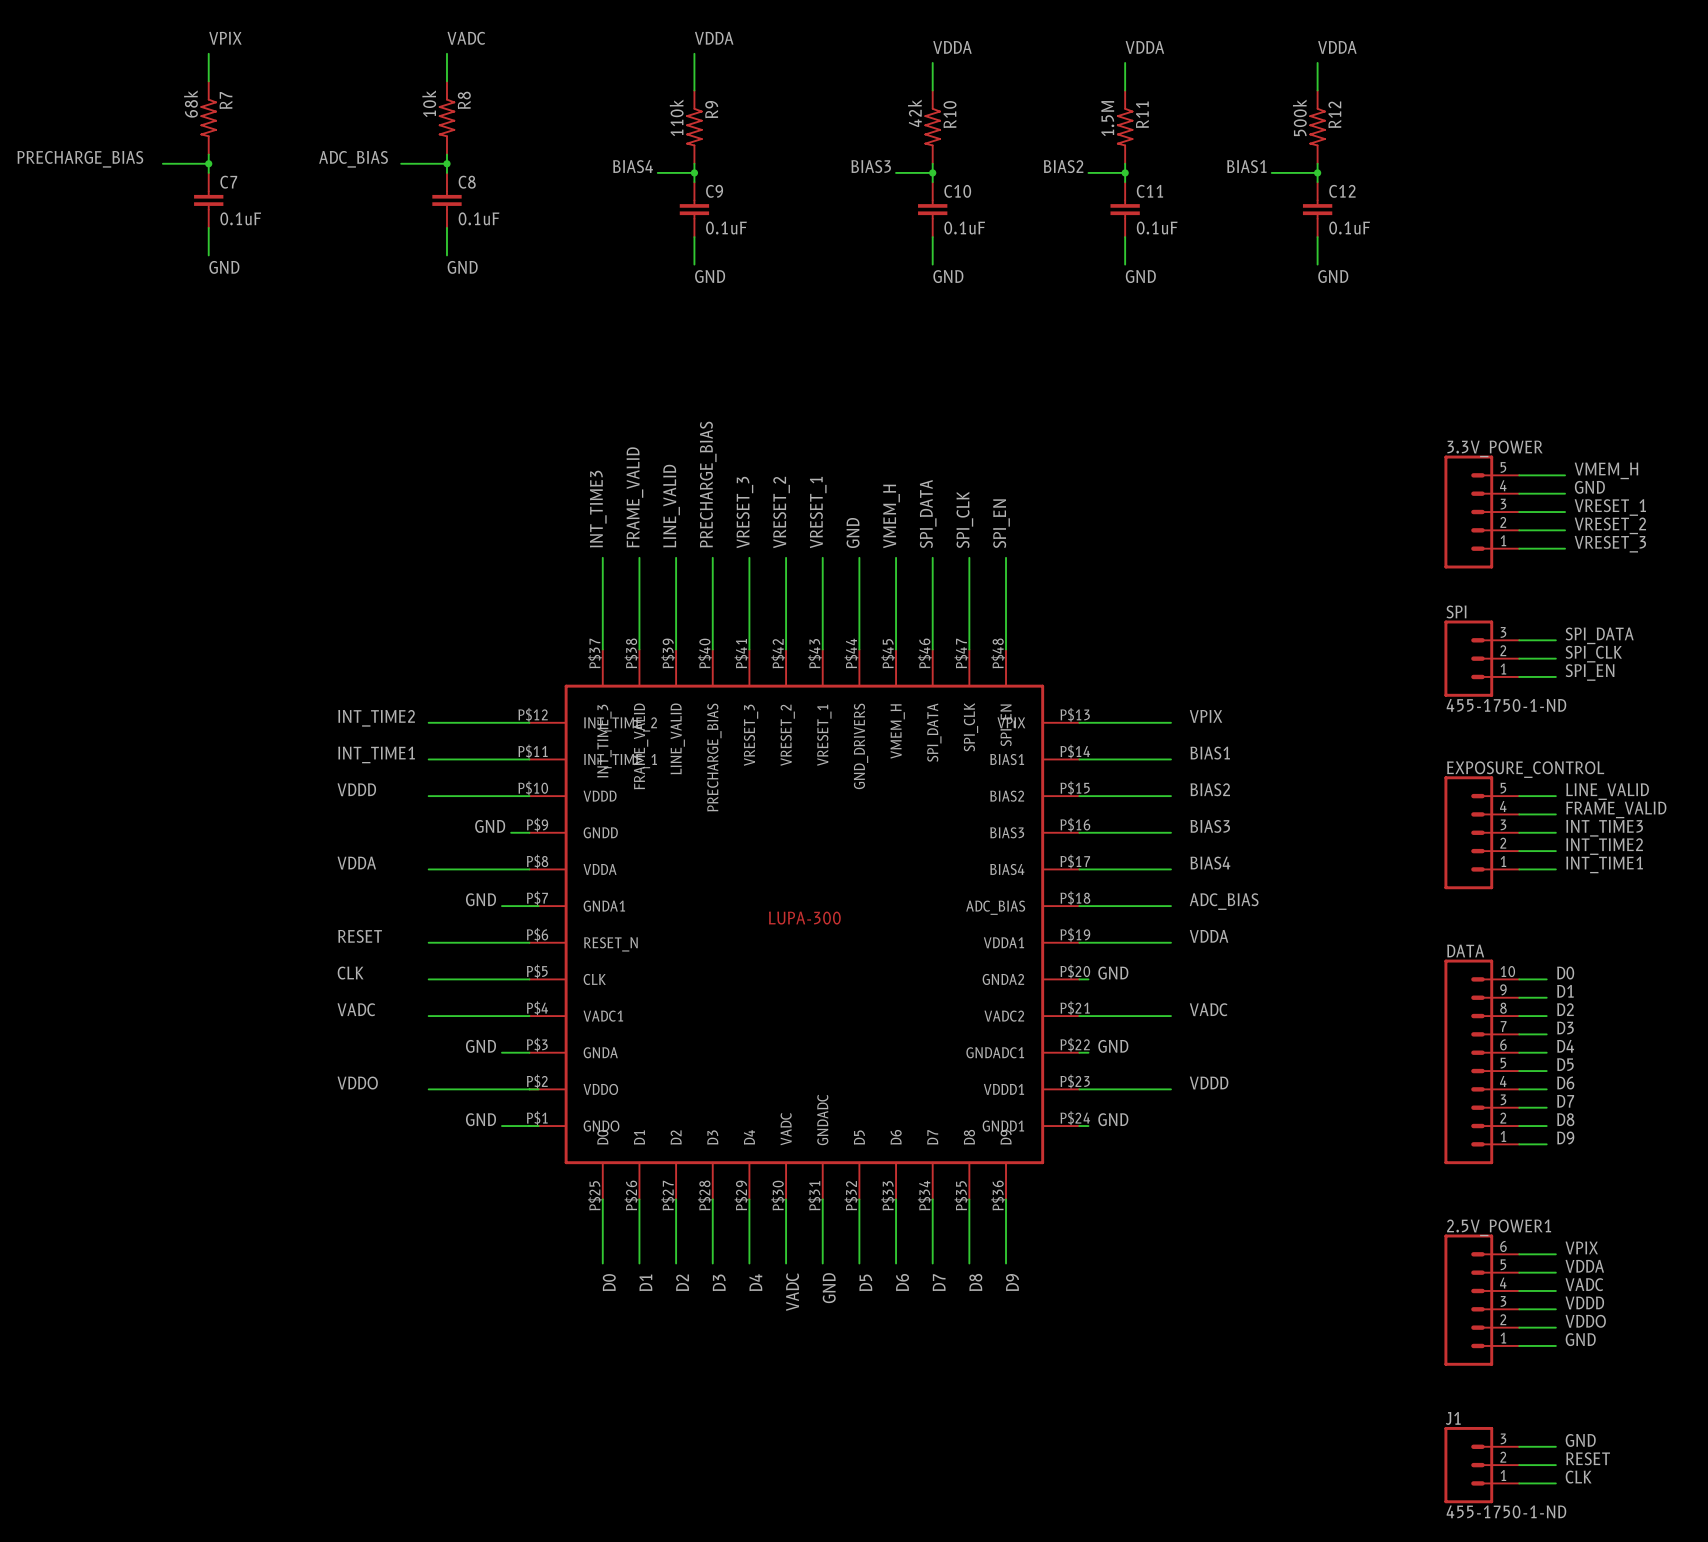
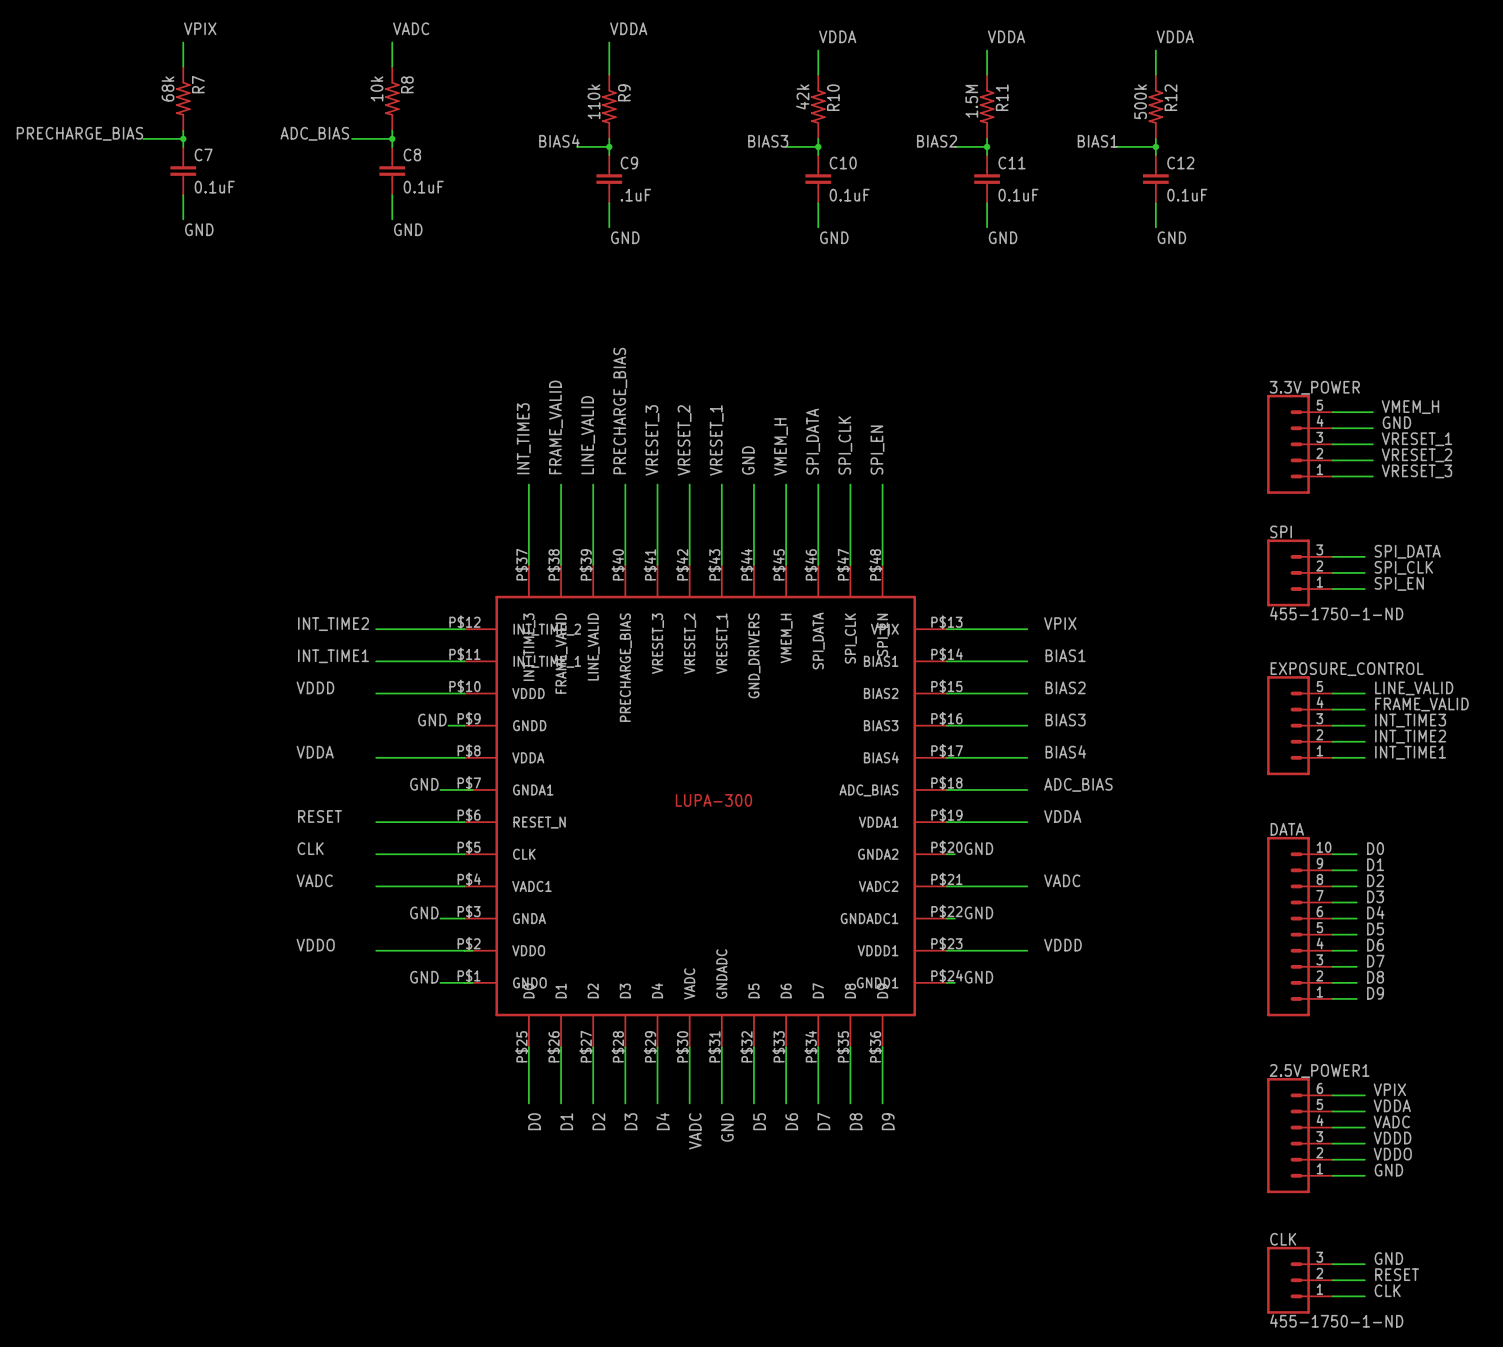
C9 value: 0.1uF (726, 227) -> .1uF (635, 195)
J1 name: J1 (1453, 1418) -> CLK (1283, 1239)

